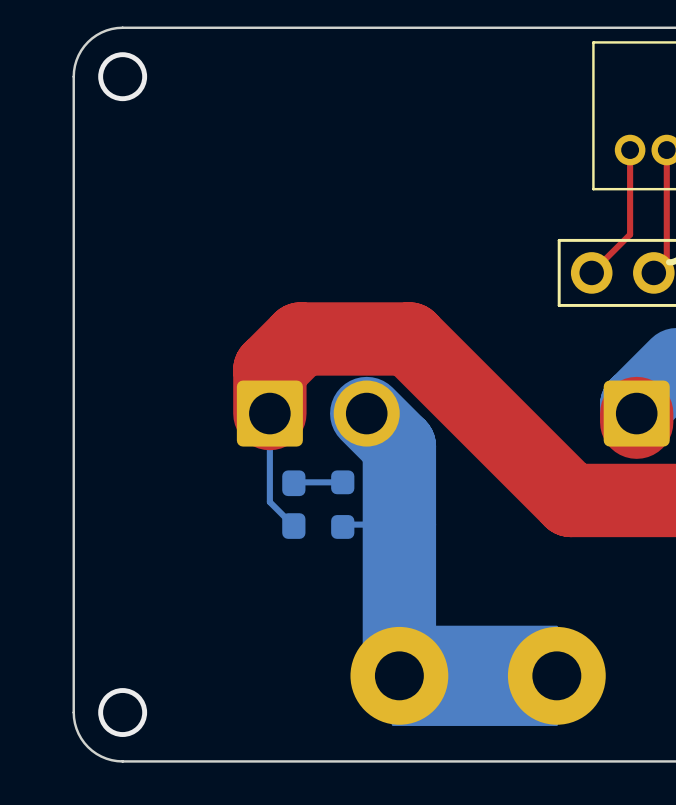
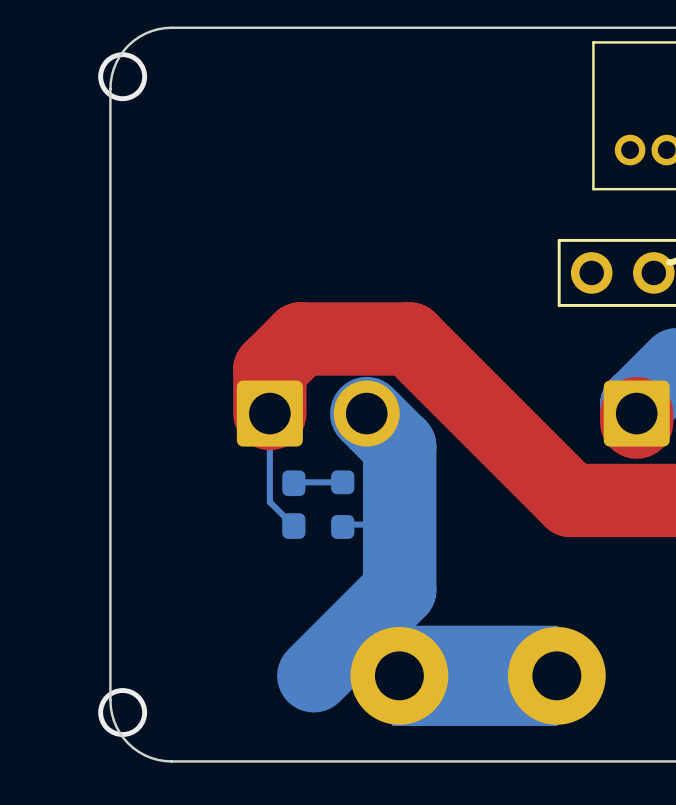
board edge: (171, 27) (117, 28) (101, 32) (92, 38) (81, 50) (76, 60) (73, 76) (74, 718) (76, 728) (84, 743) (101, 756) (117, 761) (171, 761) -> (171, 27) (151, 31) (139, 37) (128, 45) (116, 62) (111, 75) (110, 88) (110, 707) (113, 720) (119, 732) (133, 748) (151, 758) (171, 761)
top track: (630, 150) (630, 234) (591, 272) -> none
top track: (666, 150) (666, 259) (653, 272) -> none
bottom track: (399, 446) (399, 675) -> (399, 446) (399, 589) (313, 675)

